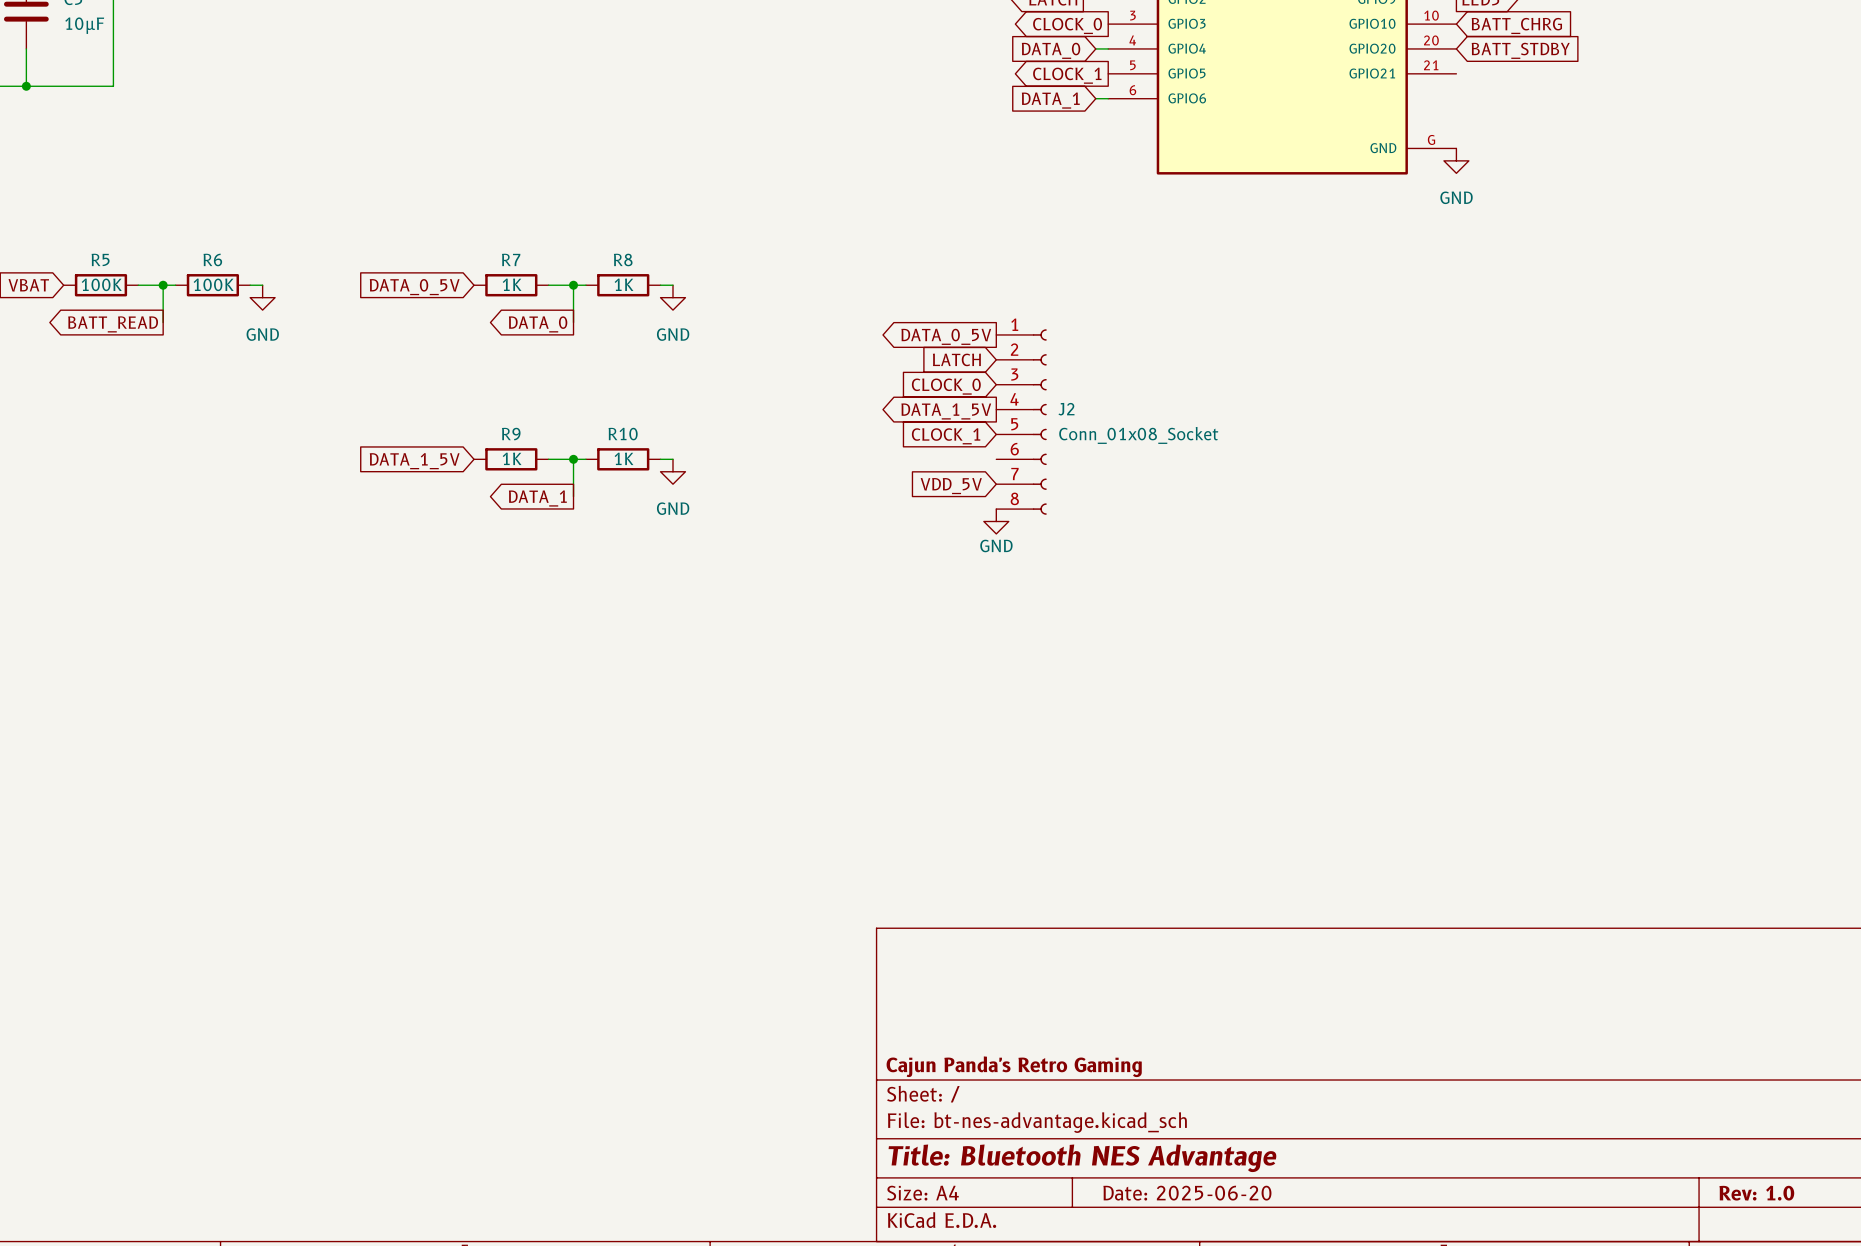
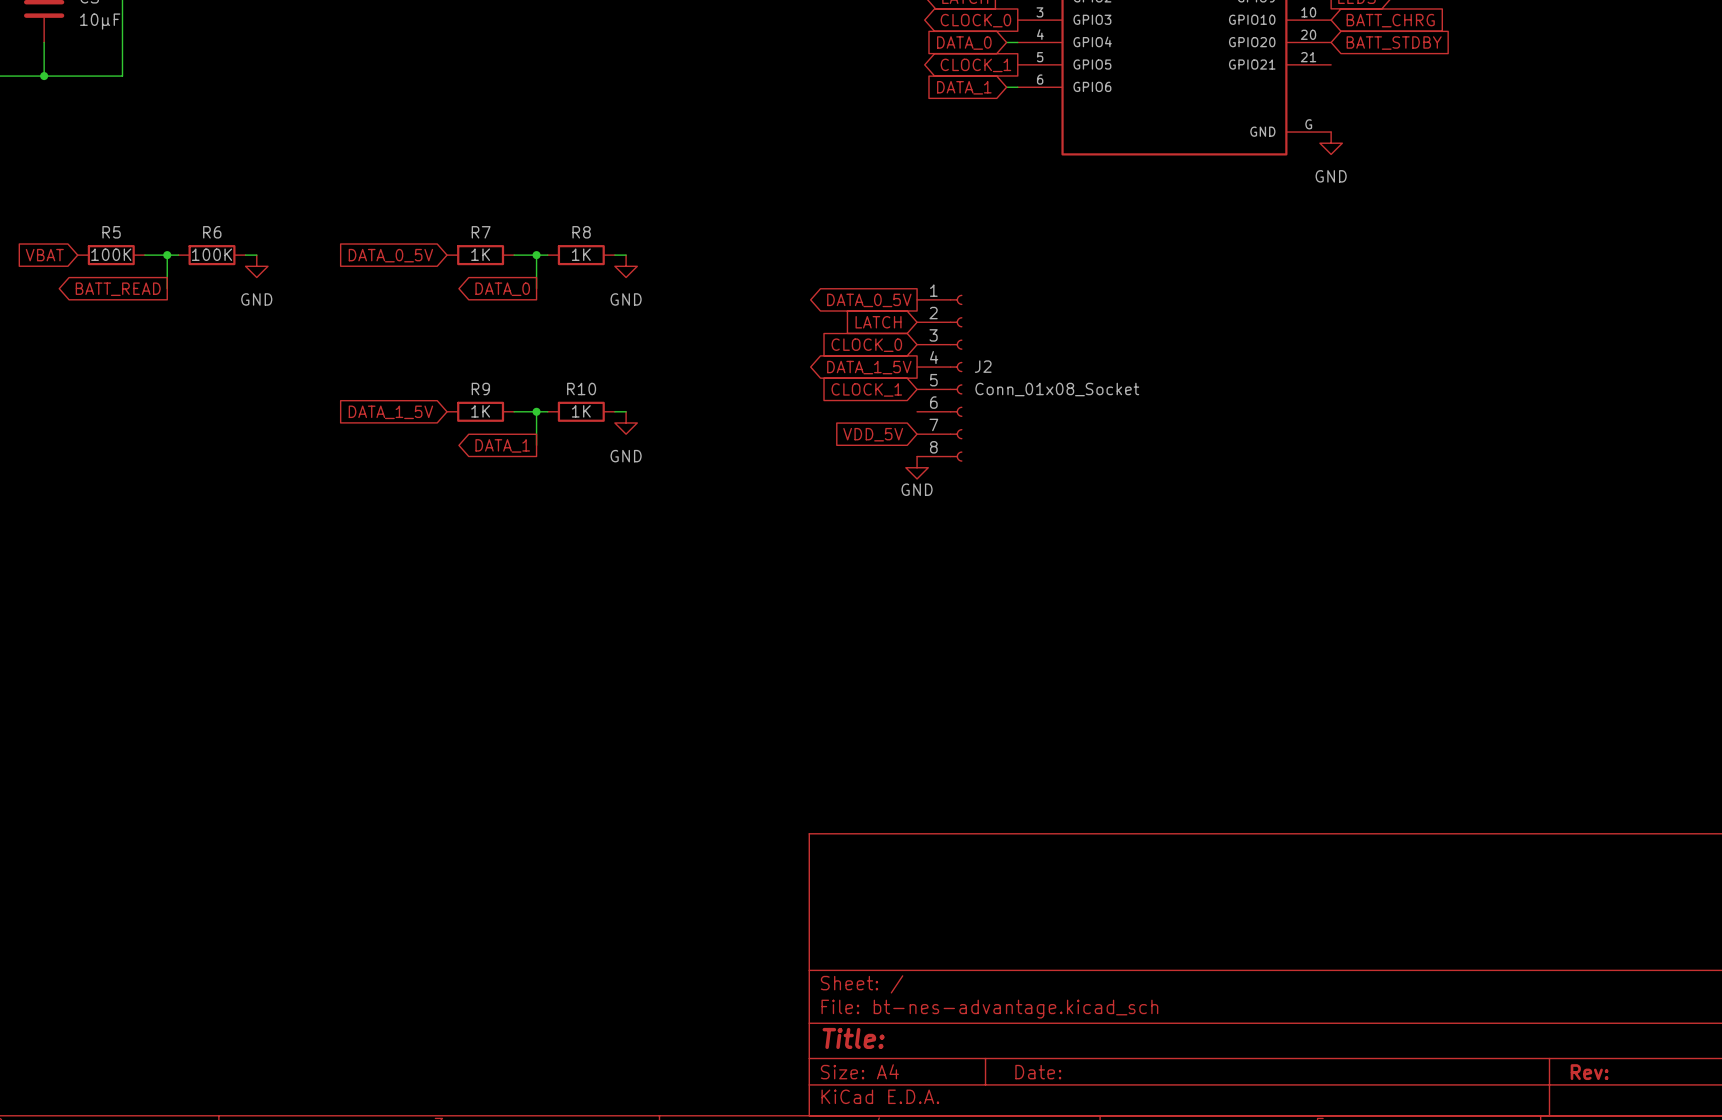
title block: Cajun Panda's Retro Gaming (1014, 1066) -> none
title block: Title: Bluetooth NES Advantage (1082, 1158) -> Title: (853, 1038)
title block: Date: 2025-06-20 (1187, 1193) -> Date: (1038, 1072)
title block: Rev: 1.0 (1756, 1193) -> Rev: (1589, 1072)

